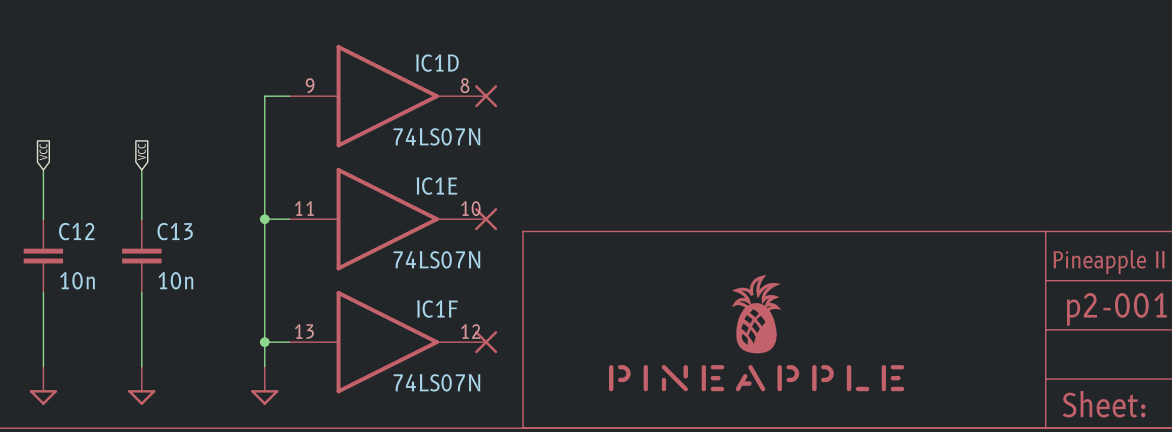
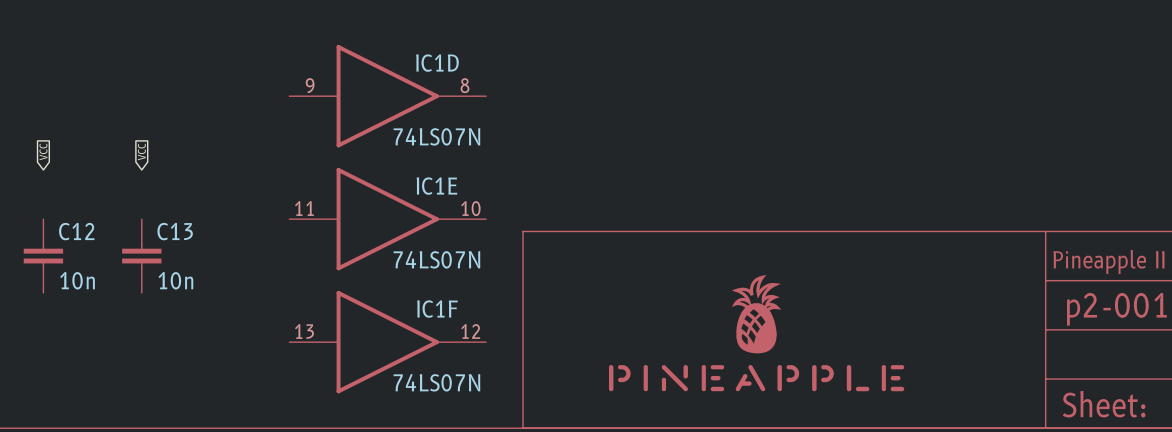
wire: (289, 96) (264, 96) (264, 366) -> none
part: (486, 96) -> none
wire: (43, 169) (43, 219) -> none
wire: (141, 169) (141, 219) -> none
wire: (264, 219) (289, 219) -> none
junction: (264, 219) -> none
part: (486, 219) -> none
wire: (43, 292) (43, 366) -> none
wire: (141, 292) (141, 366) -> none
wire: (264, 342) (289, 342) -> none
junction: (264, 342) -> none
part: (486, 342) -> none
power symbol: (43, 385) -> none
power symbol: (141, 385) -> none
power symbol: (264, 385) -> none

